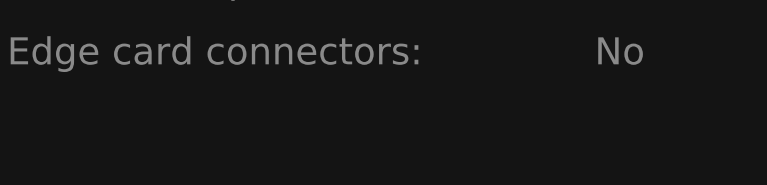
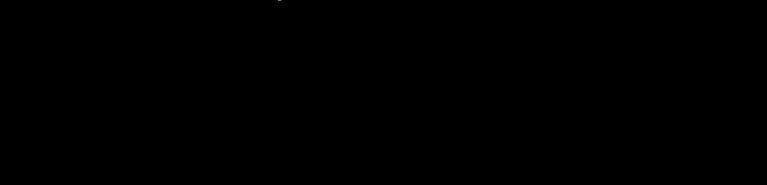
text: No (620, 51) -> none
text: Edge card connectors: (214, 54) -> none

